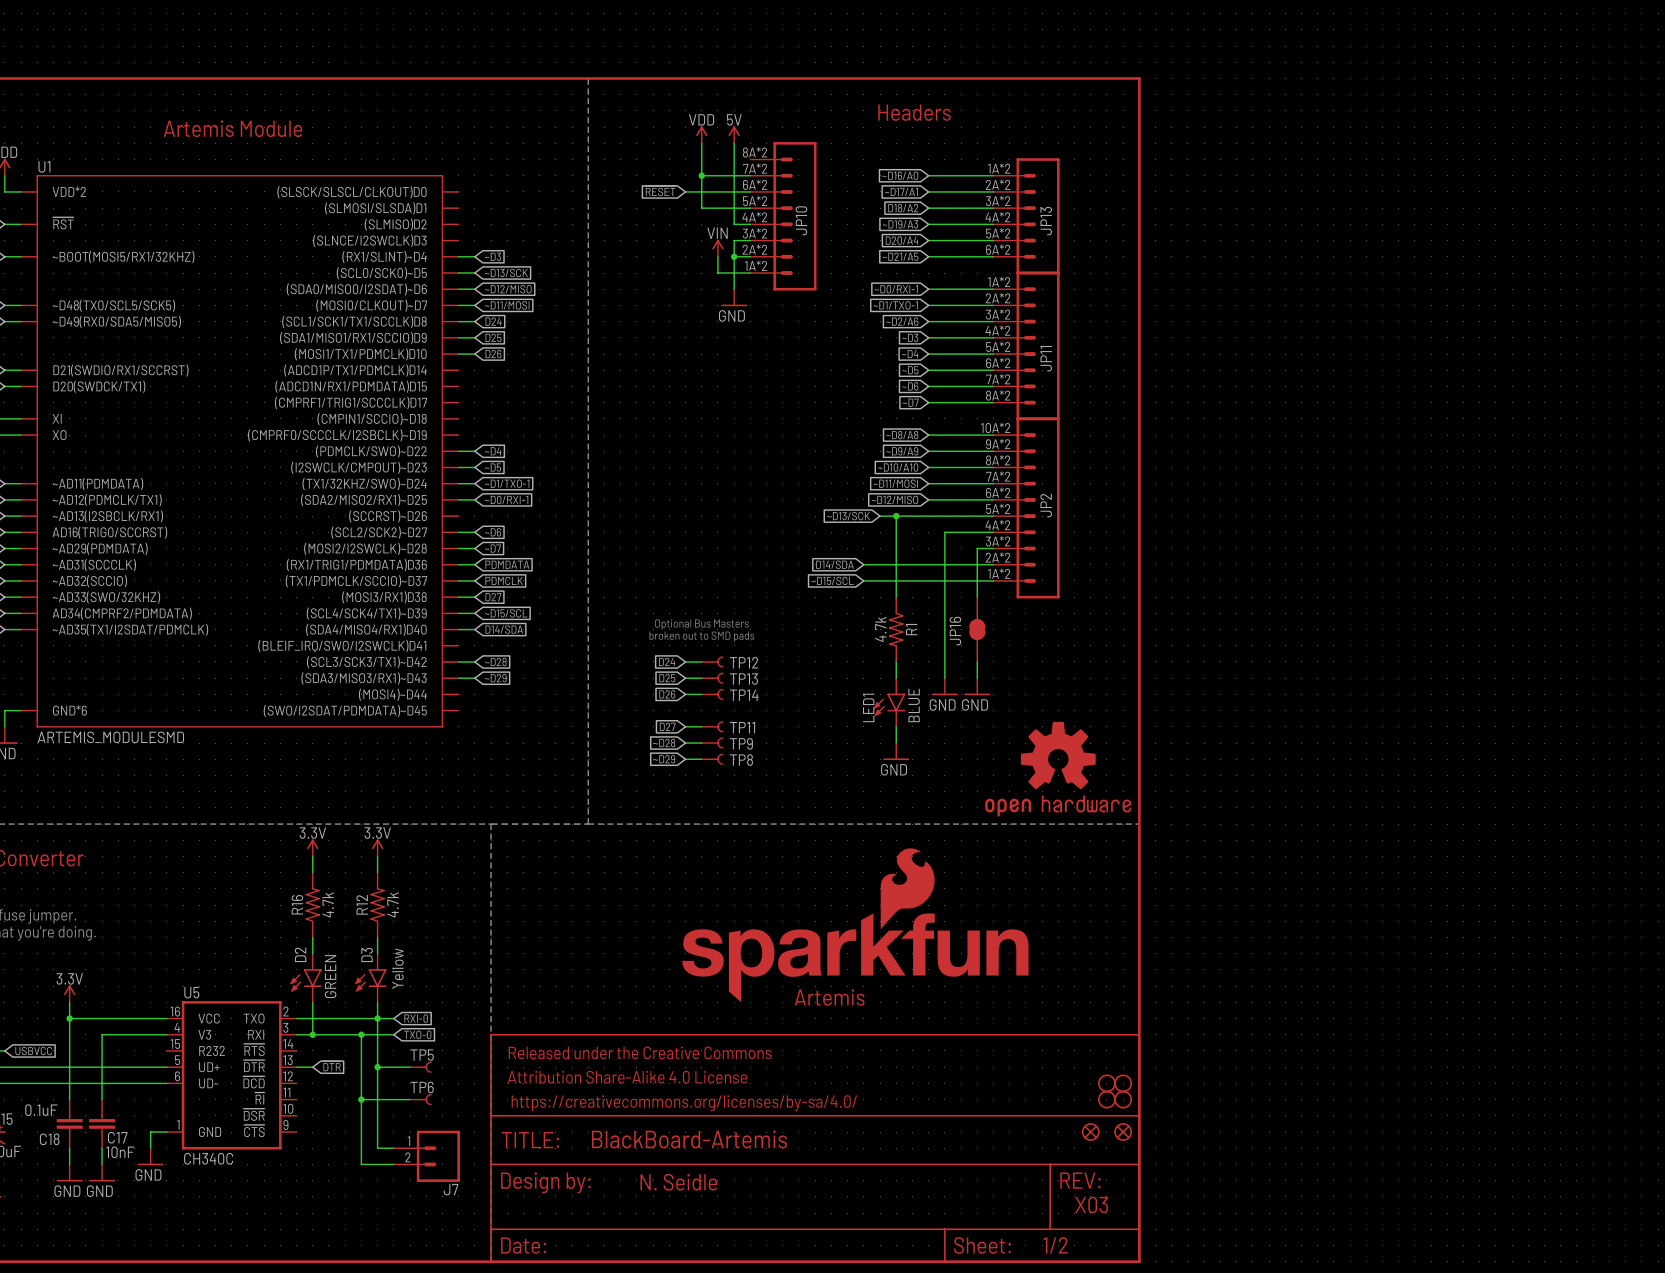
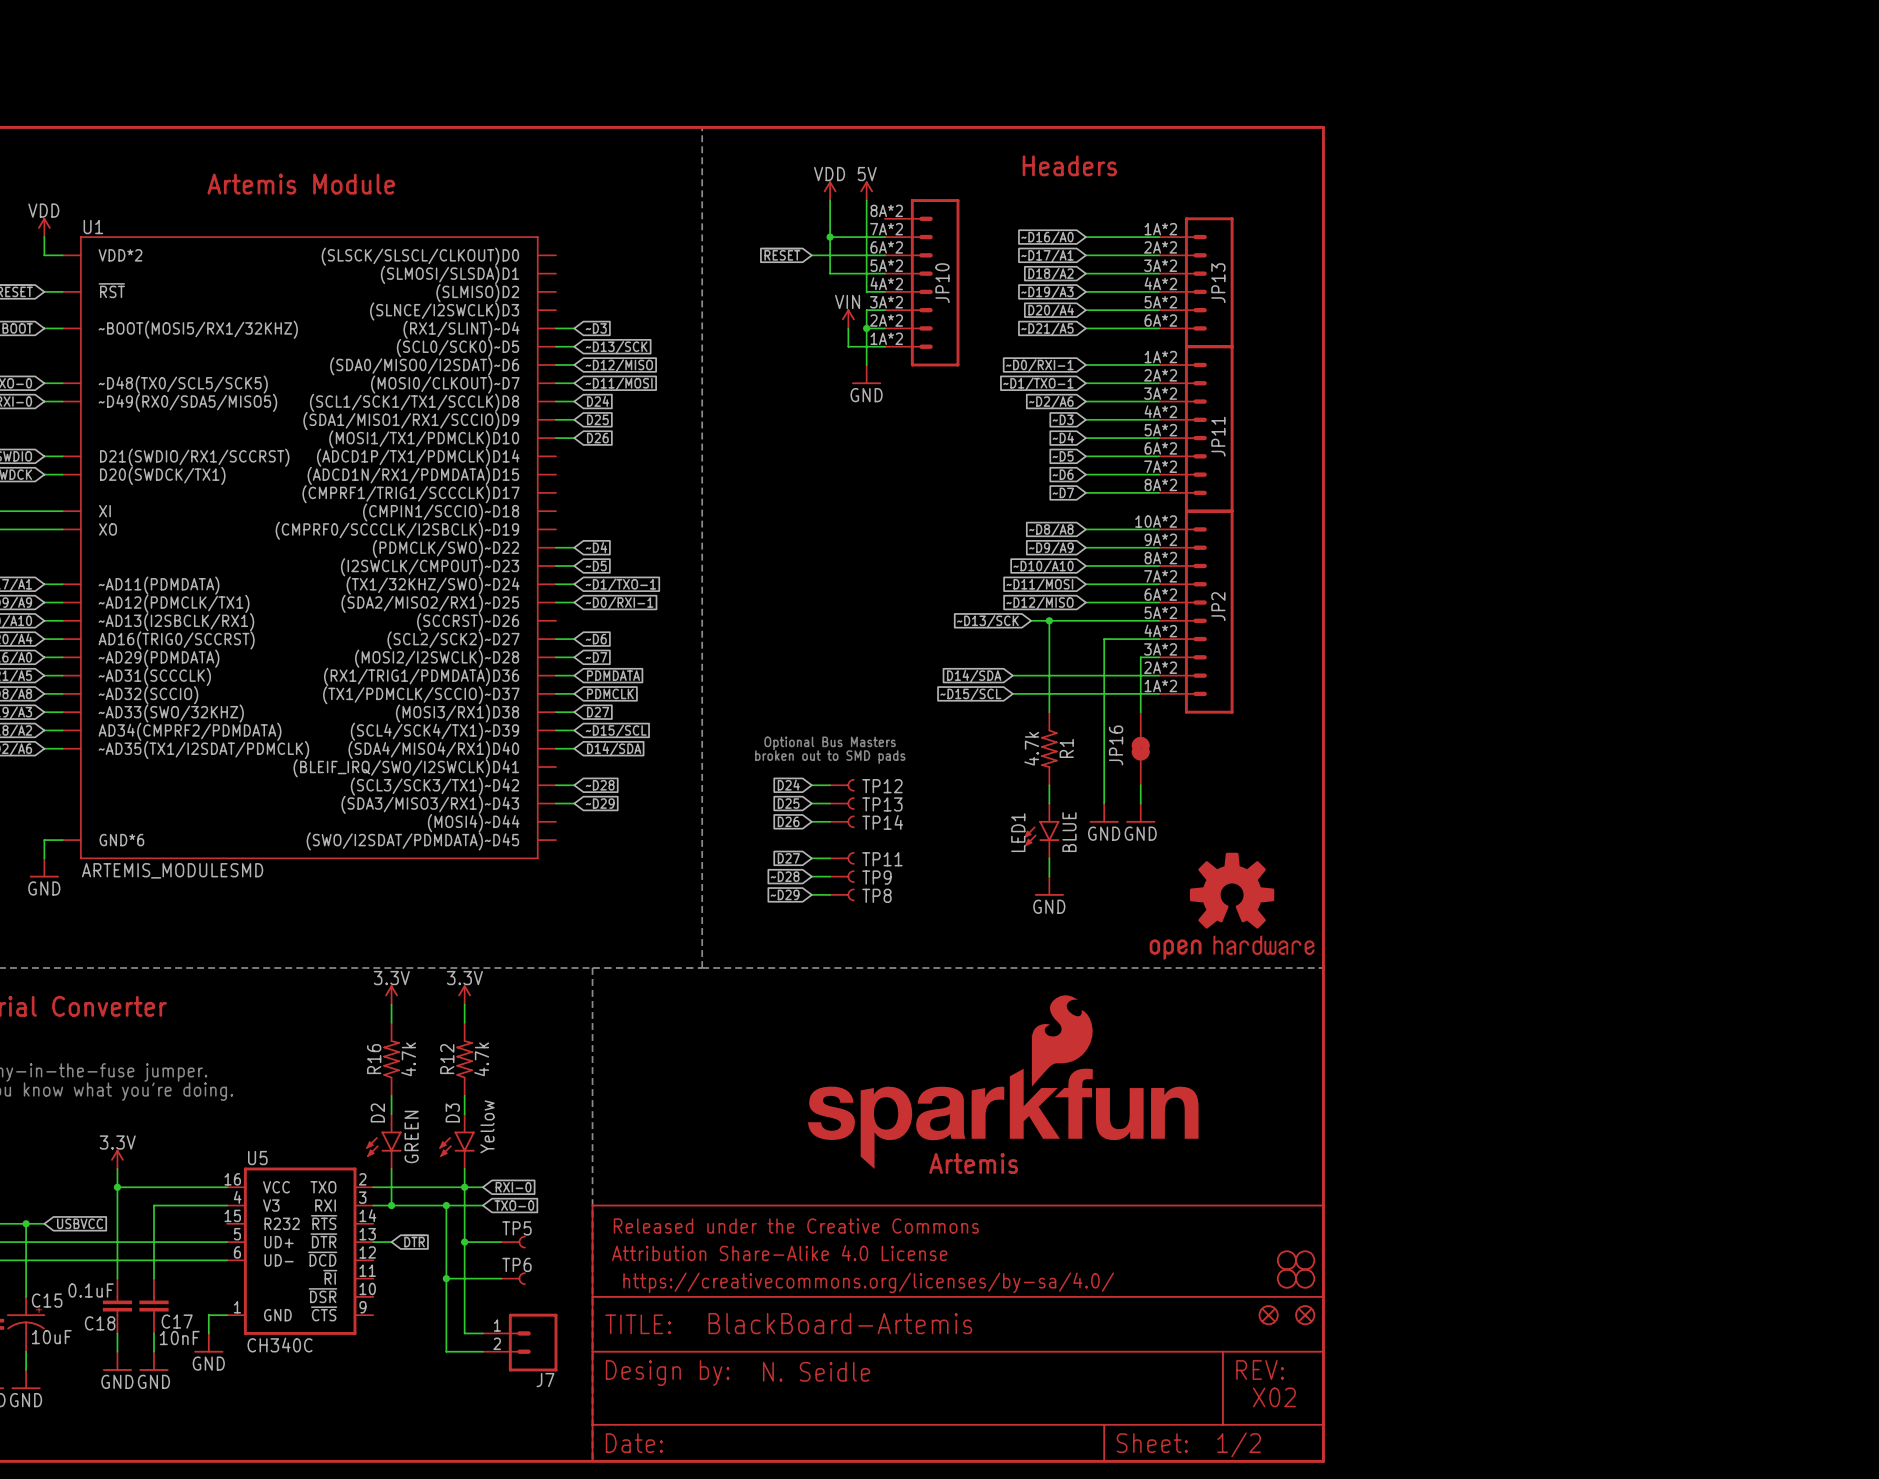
text: X03 (1091, 1204) -> X02 (1274, 1397)

